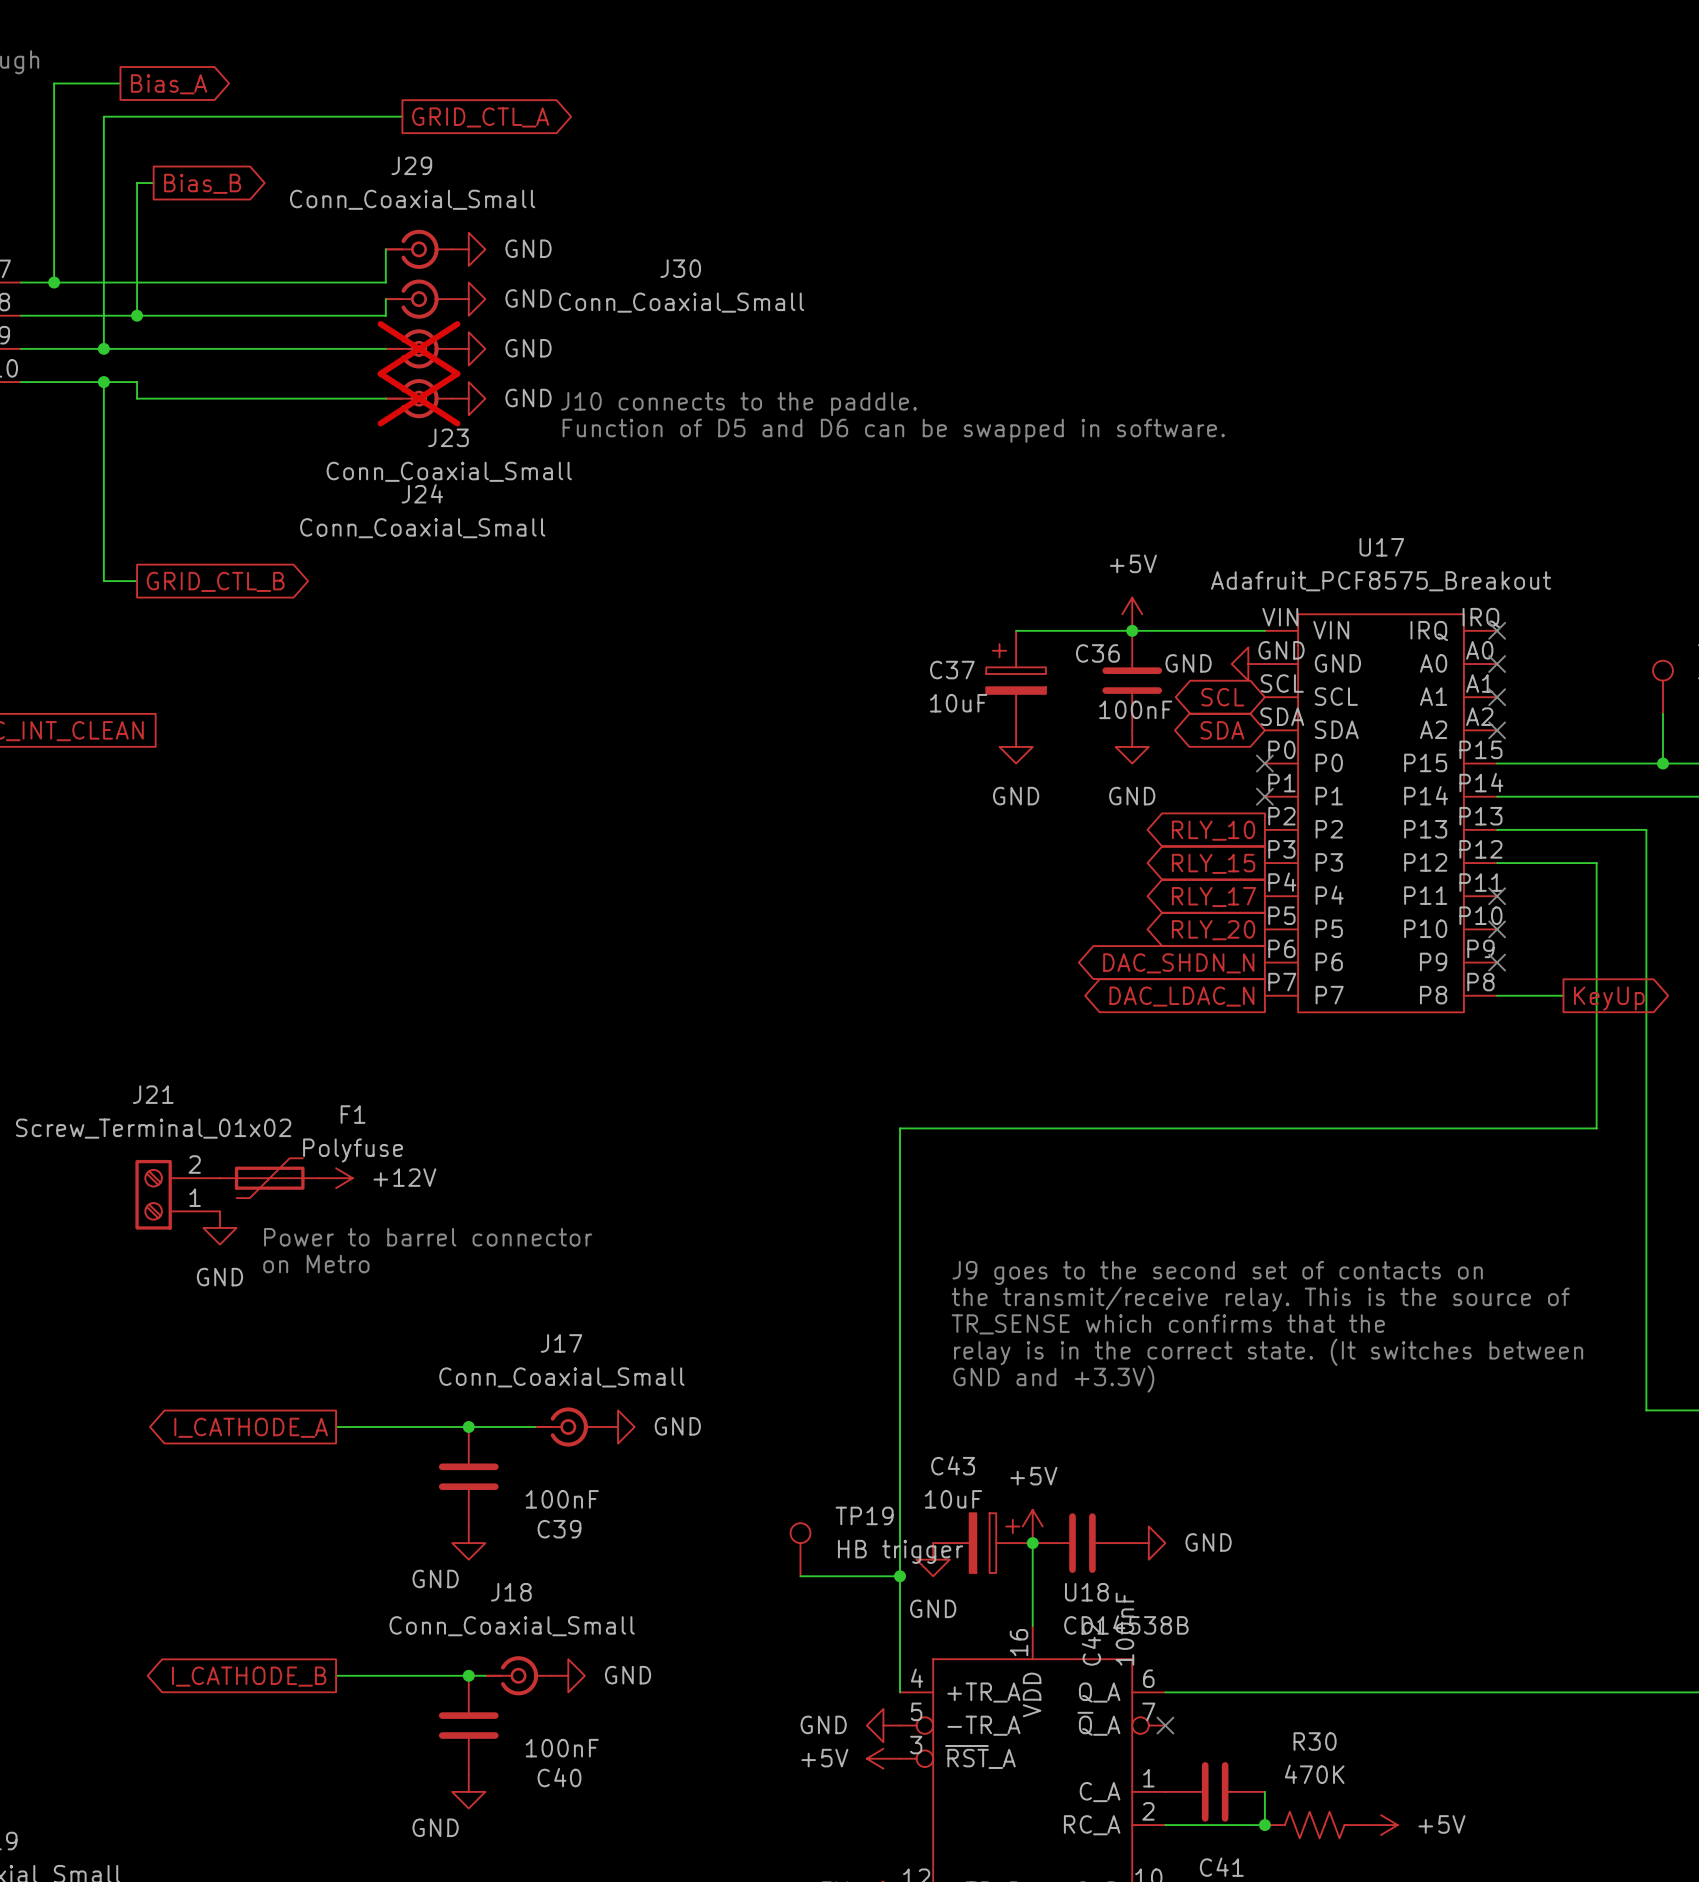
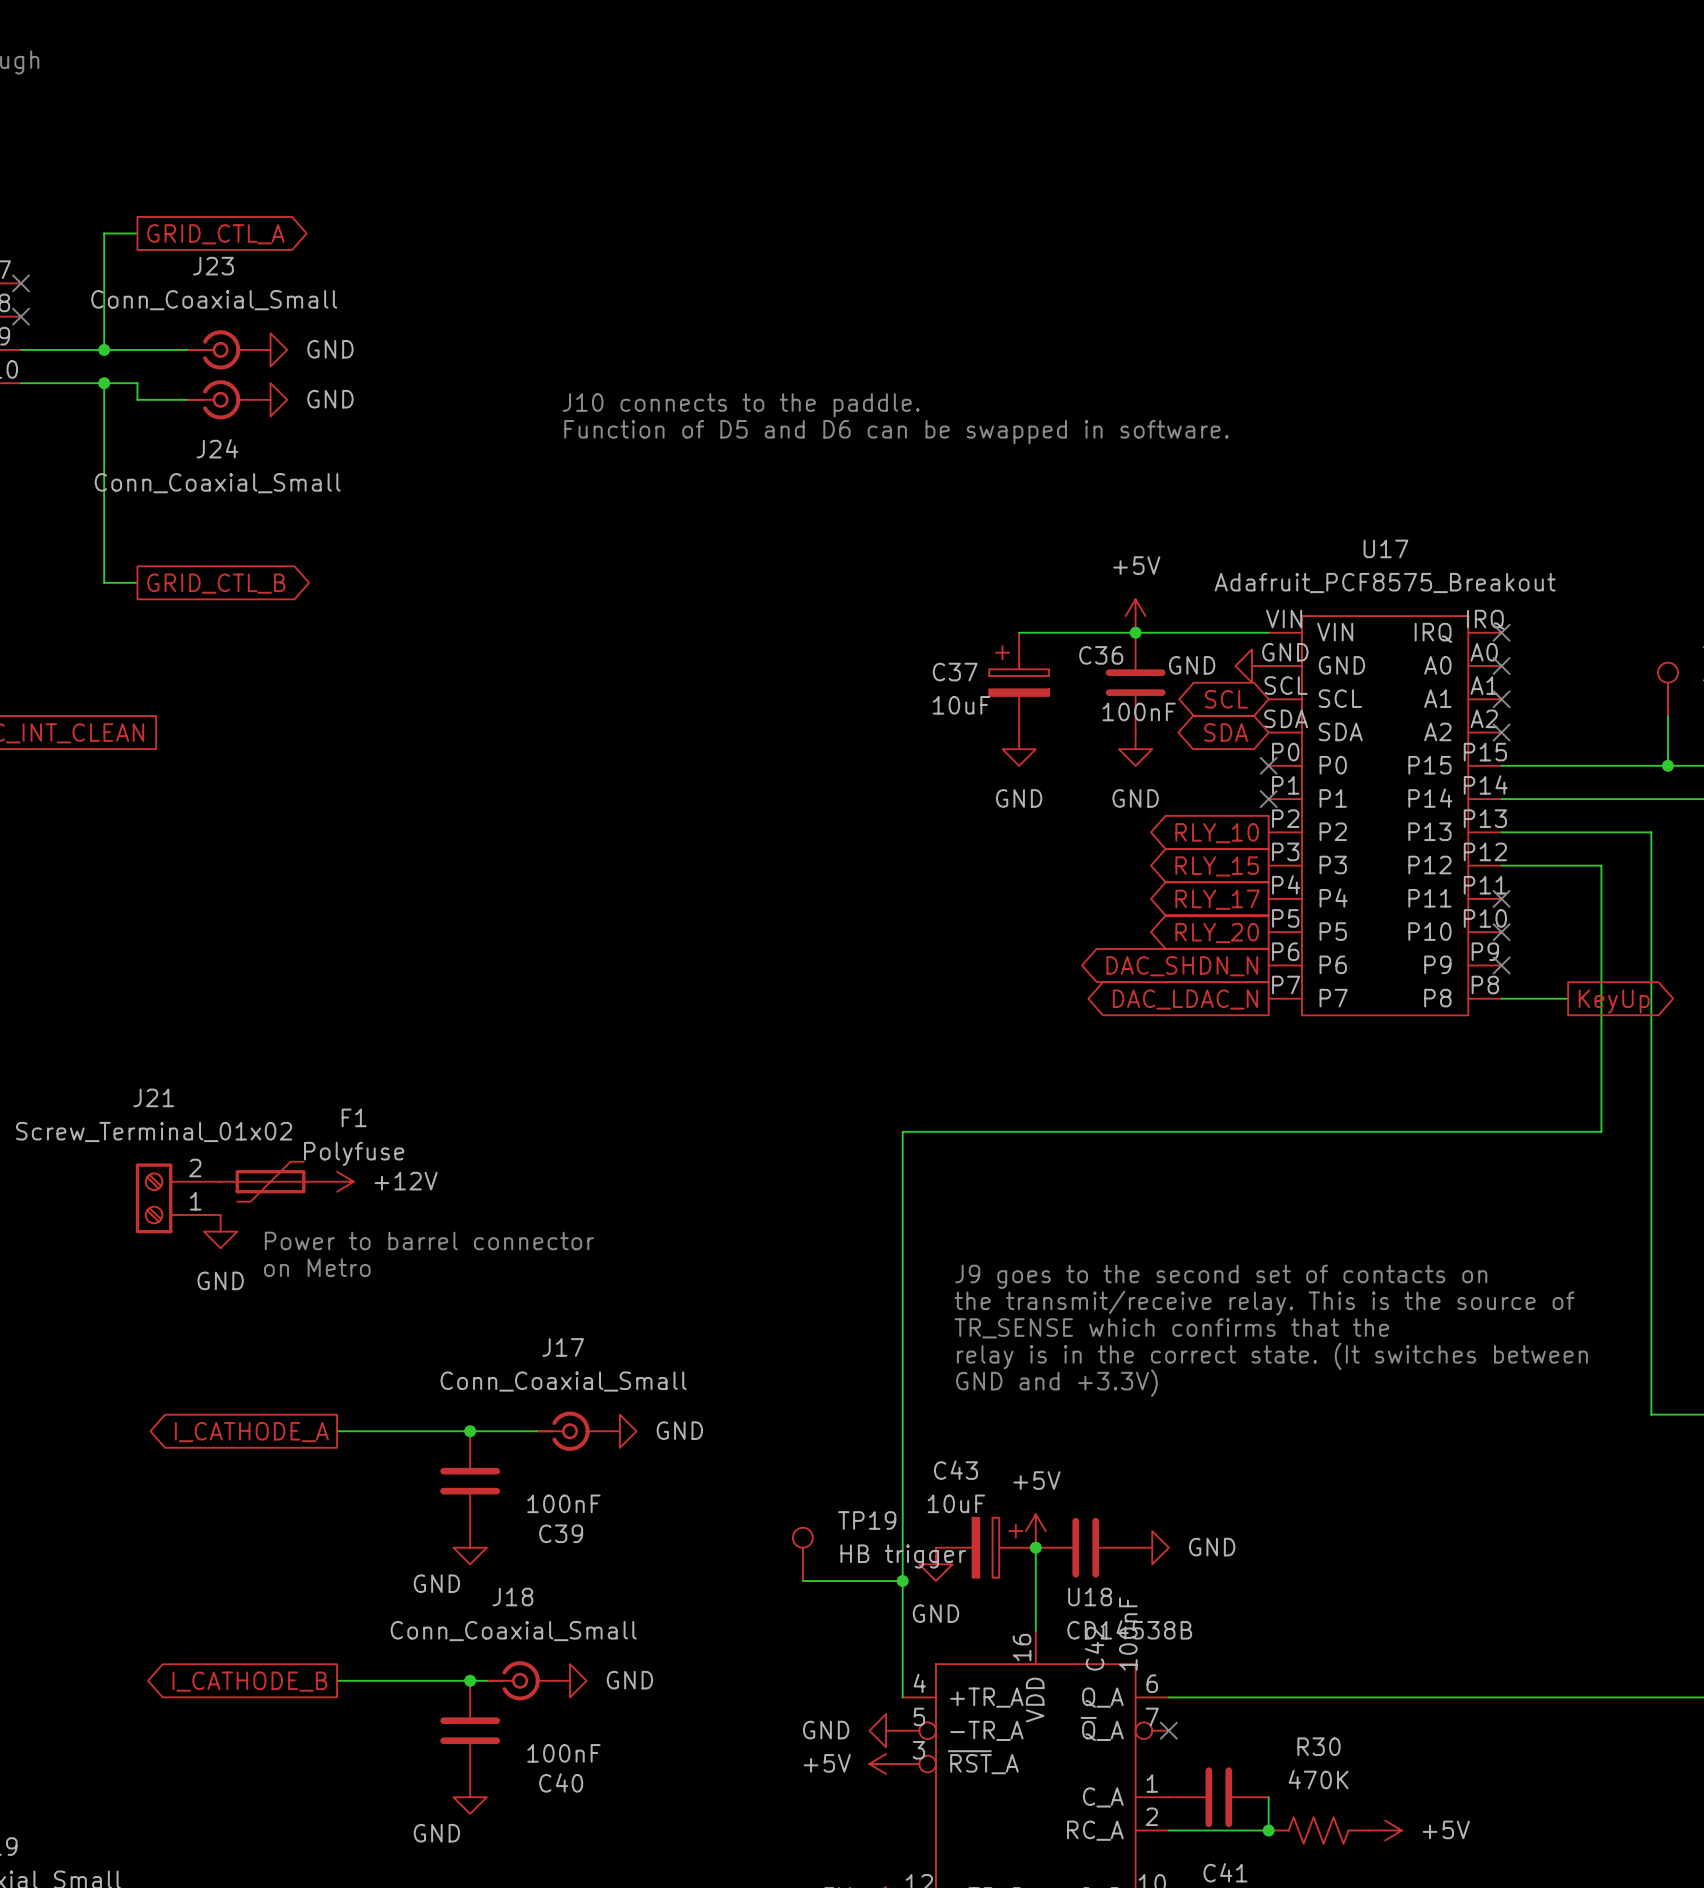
wire: (120, 83) (54, 83) (54, 282) -> none
global label: Bias_A (169, 84) -> none
wire: (402, 116) (103, 116) (103, 232) -> (137, 233) (104, 233)
global label position: GRID_CTL_A (480, 117) -> GRID_CTL_A (215, 234)
wire: (153, 183) (137, 183) (137, 315) -> none
global label: Bias_B (202, 183) -> none
wire: (385, 249) (385, 282) (20, 282) -> none
J29: Conn_Coaxial_Small (419, 249) -> none
power symbol: GND (468, 249) -> none
no-connect mark: none -> (21, 283)
junction: (54, 282) -> none
wire: (385, 299) (385, 315) (20, 315) -> none
J30: Conn_Coaxial_Small (419, 299) -> none
power symbol: GND (468, 299) -> none
no-connect mark: none -> (21, 316)
junction: (137, 315) -> none
wire: (186, 348) (385, 348) -> none
power symbol: none -> GND (270, 349)
J23 position: (419, 348) -> (220, 349)
J23 do-not-place cross: (419, 348) -> none
power symbol: GND (468, 348) -> none
wire: (186, 398) (385, 398) -> none
power symbol: none -> GND (270, 399)
J24 position: (419, 398) -> (220, 399)
J24 do-not-place cross: (419, 398) -> none
power symbol: GND (468, 398) -> none
J23 name position: J23 (448, 437) -> J23 (213, 266)
J23 value position: Conn_Coaxial_Small (449, 471) -> Conn_Coaxial_Small (214, 300)
J24 name position: J24 (422, 493) -> J24 (217, 448)
J24 value position: Conn_Coaxial_Small (422, 528) -> Conn_Coaxial_Small (217, 483)

